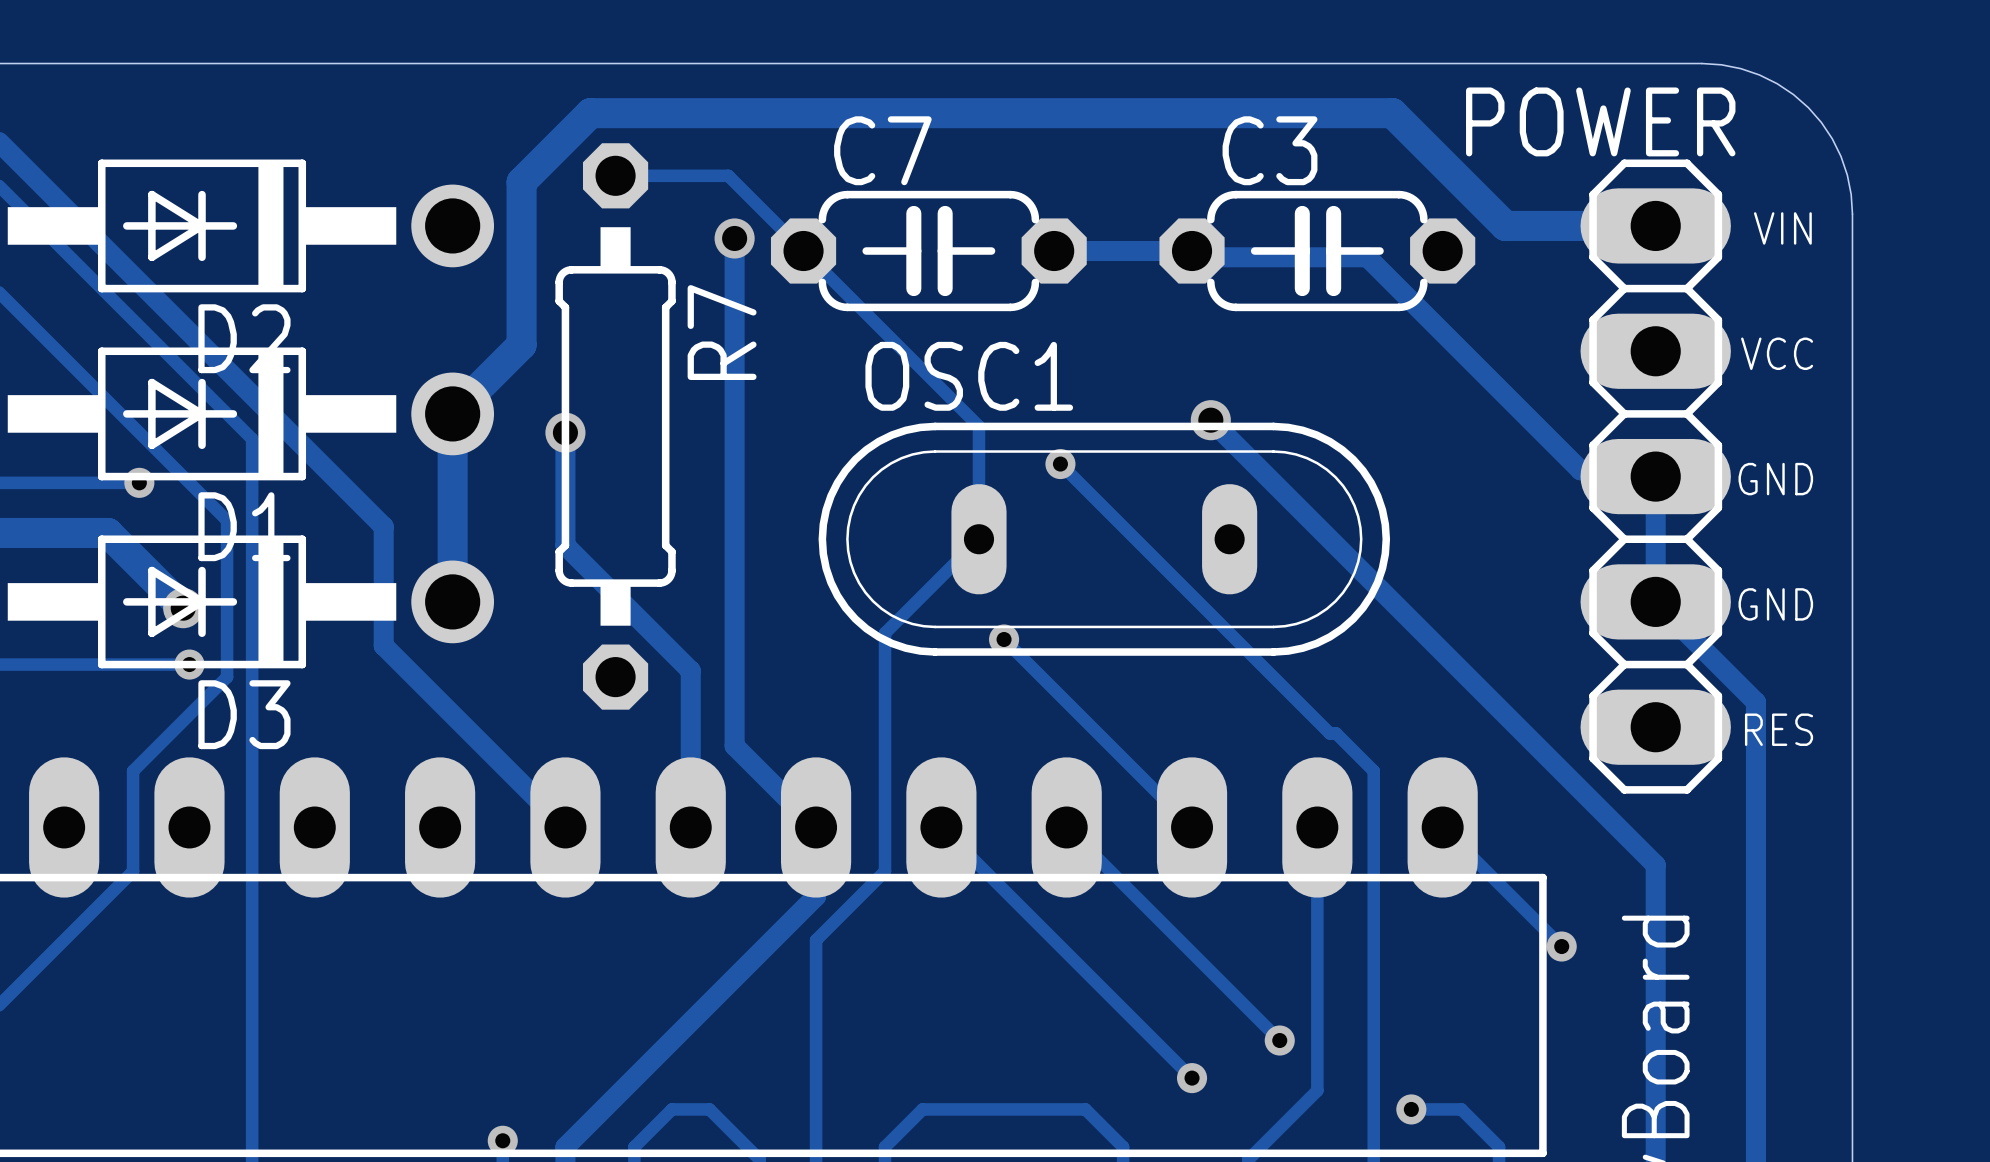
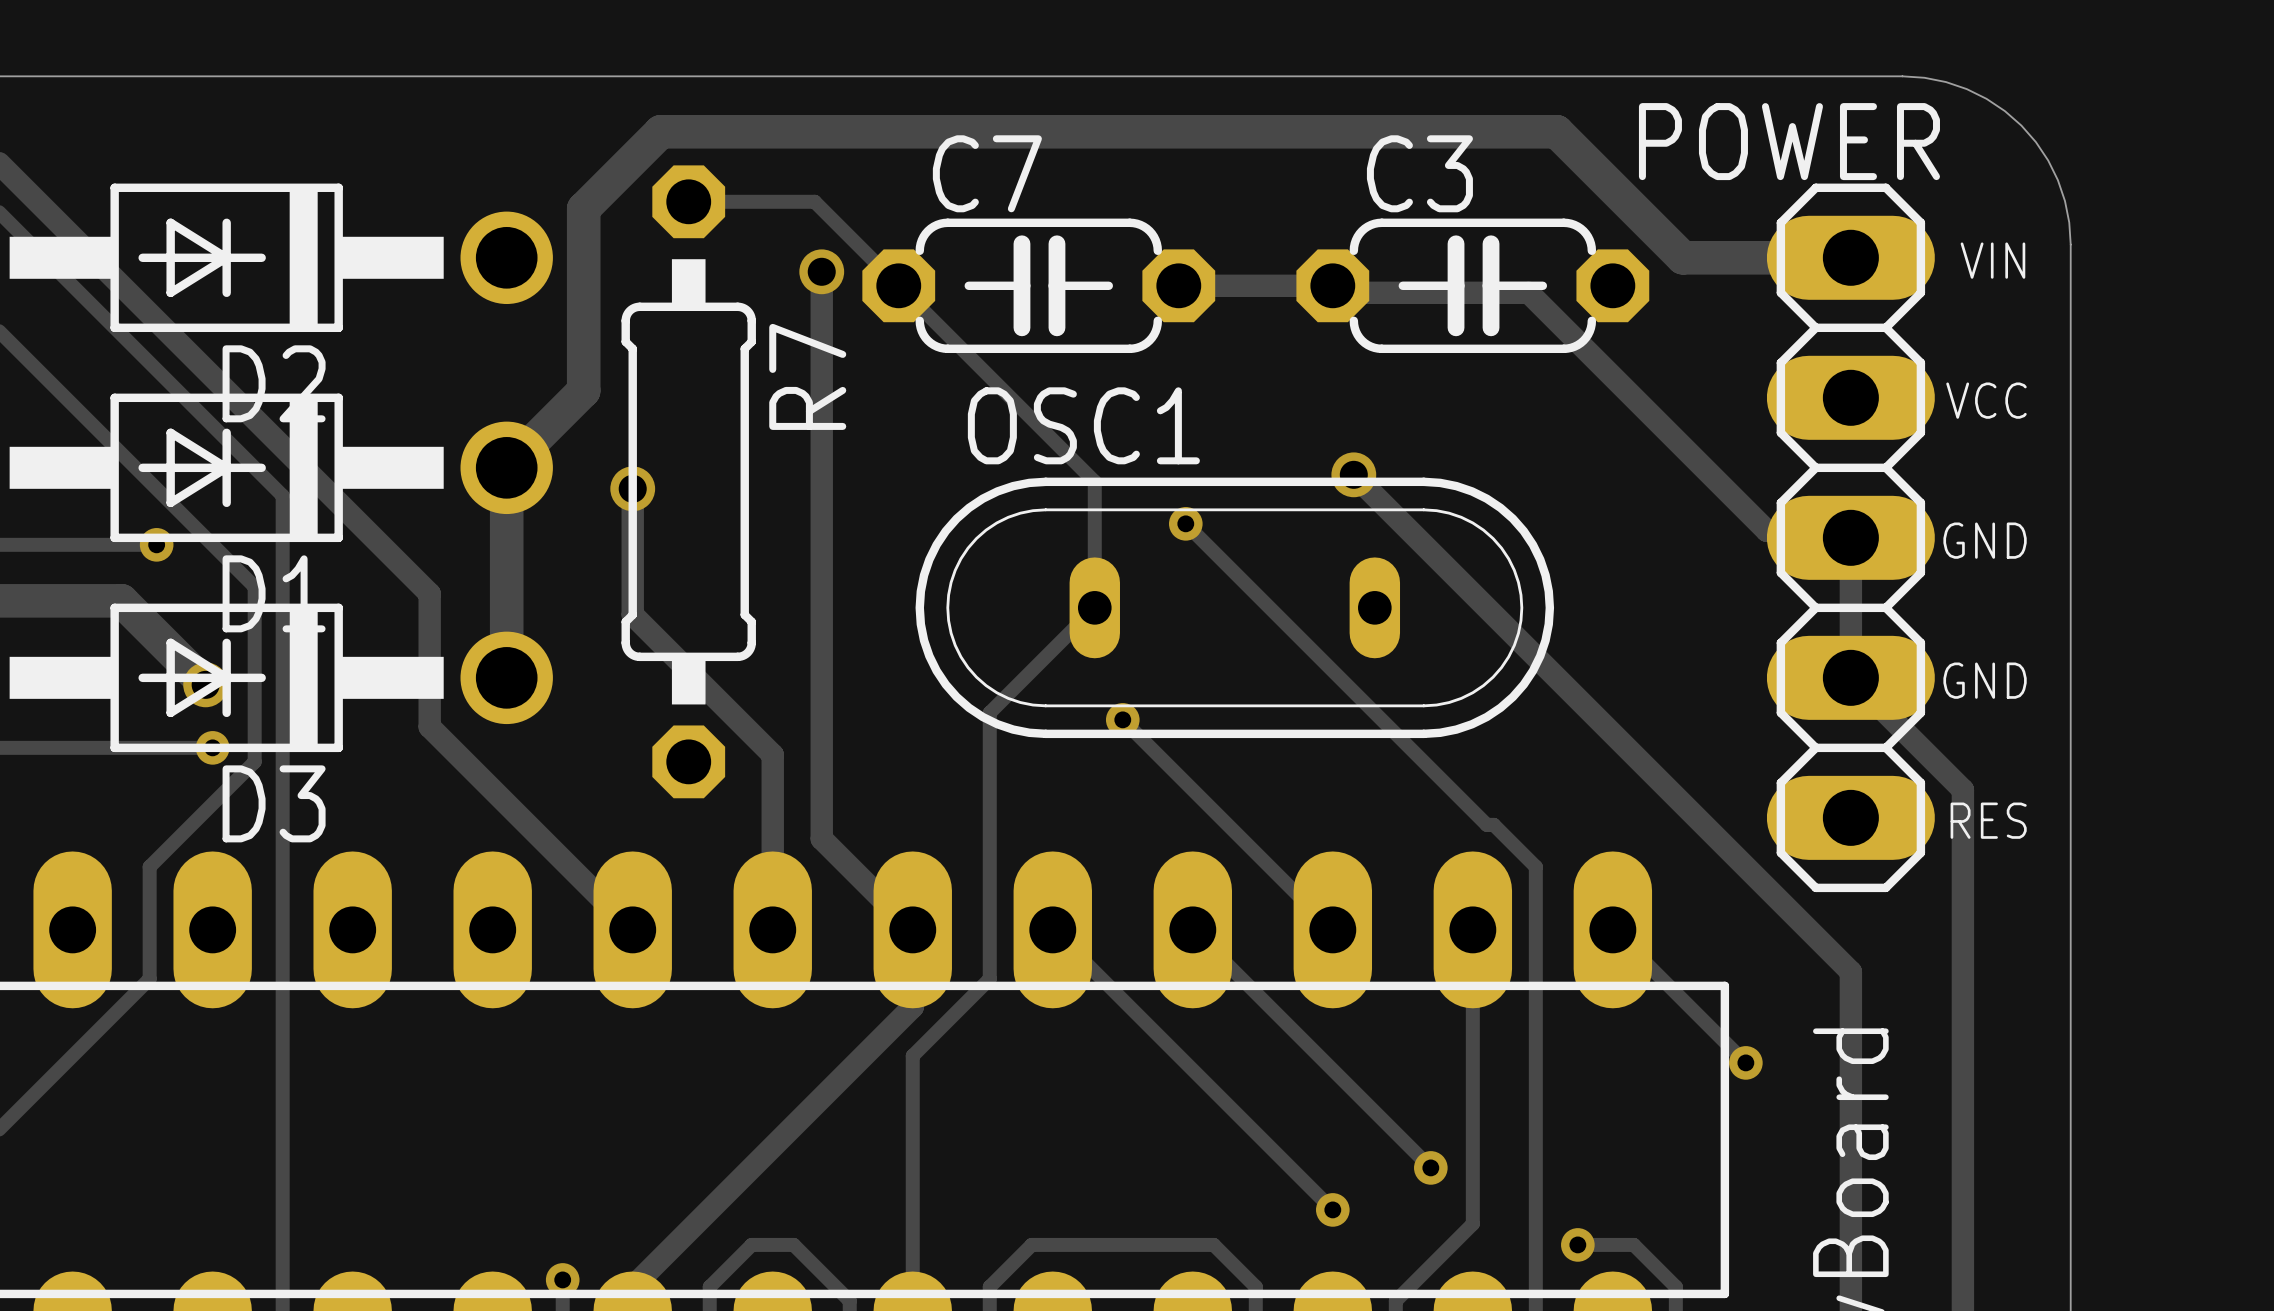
OSC1 footprint: [818, 422, 1391, 656] -> [915, 477, 1555, 739]

